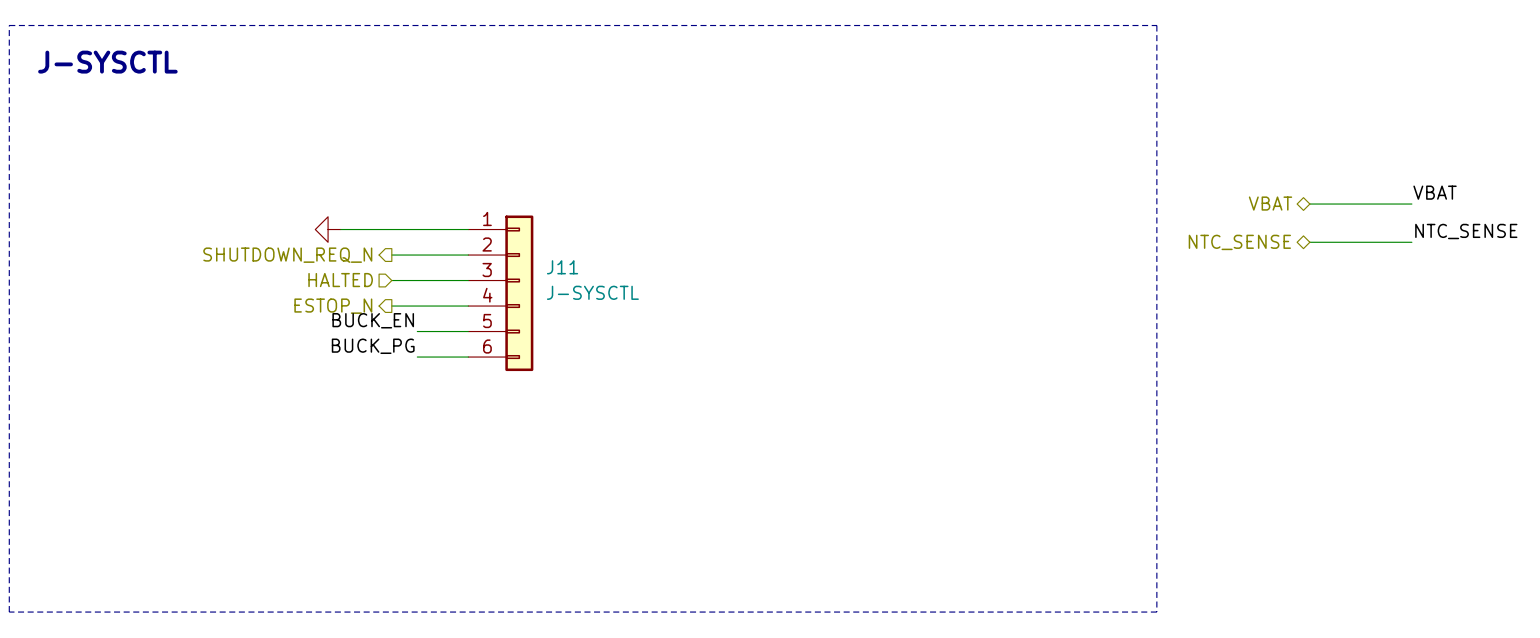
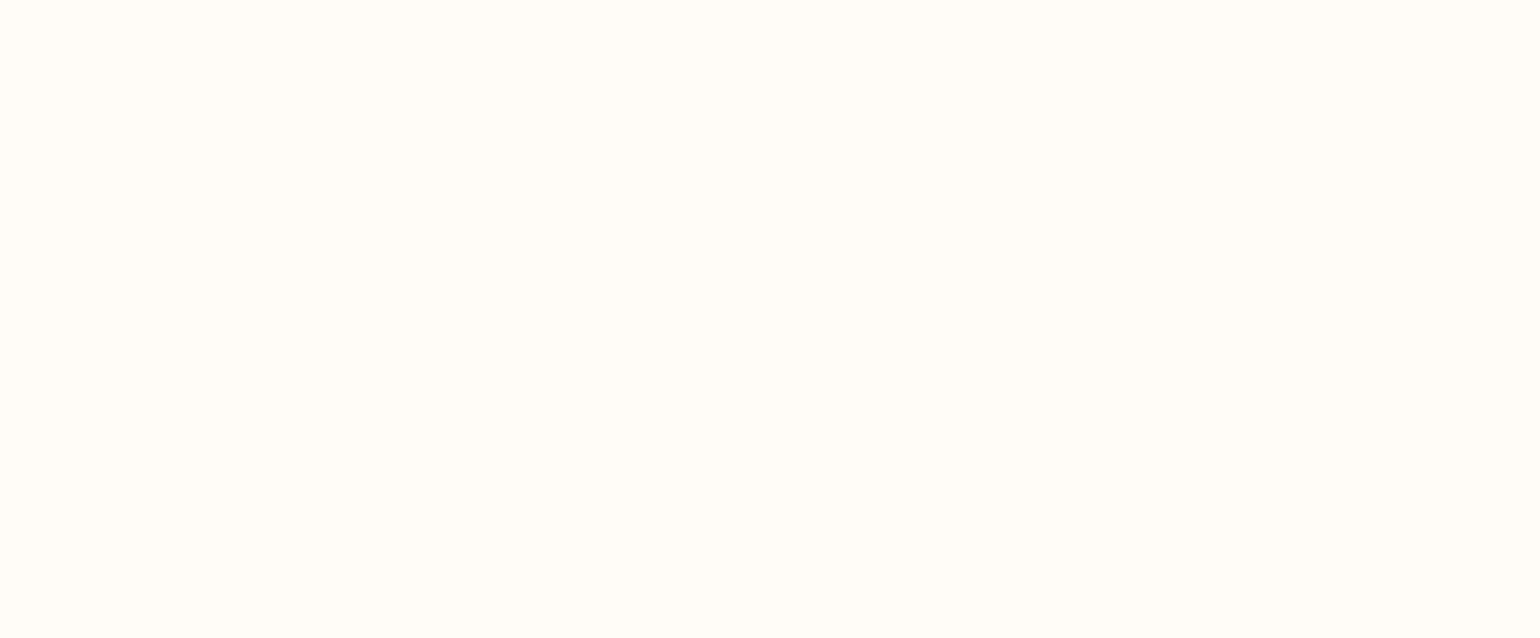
line: (9, 25) (1156, 25) (1156, 612) (9, 612) (9, 25) -> none
text: J-SYSCTL (107, 62) -> none
label: VBAT (1435, 192) -> none
hierarchical label: VBAT (1270, 203) -> none
wire: (1309, 204) (1411, 204) -> none
power symbol: (328, 229) -> none
wire: (340, 229) (468, 229) -> none
label: NTC_SENSE (1466, 231) -> none
hierarchical label: NTC_SENSE (1239, 242) -> none
wire: (1309, 242) (1411, 242) -> none
hierarchical label: SHUTDOWN_REQ_N (287, 255) -> none
wire: (391, 255) (468, 255) -> none
hierarchical label: HALTED (340, 280) -> none
wire: (391, 280) (468, 280) -> none
J11: J-SYSCTL (500, 293) -> none
hierarchical label: ESTOP_N (333, 306) -> none
wire: (391, 306) (468, 306) -> none
label: BUCK_EN (373, 320) -> none
wire: (417, 331) (468, 331) -> none
label: BUCK_PG (373, 346) -> none
wire: (417, 357) (468, 357) -> none

